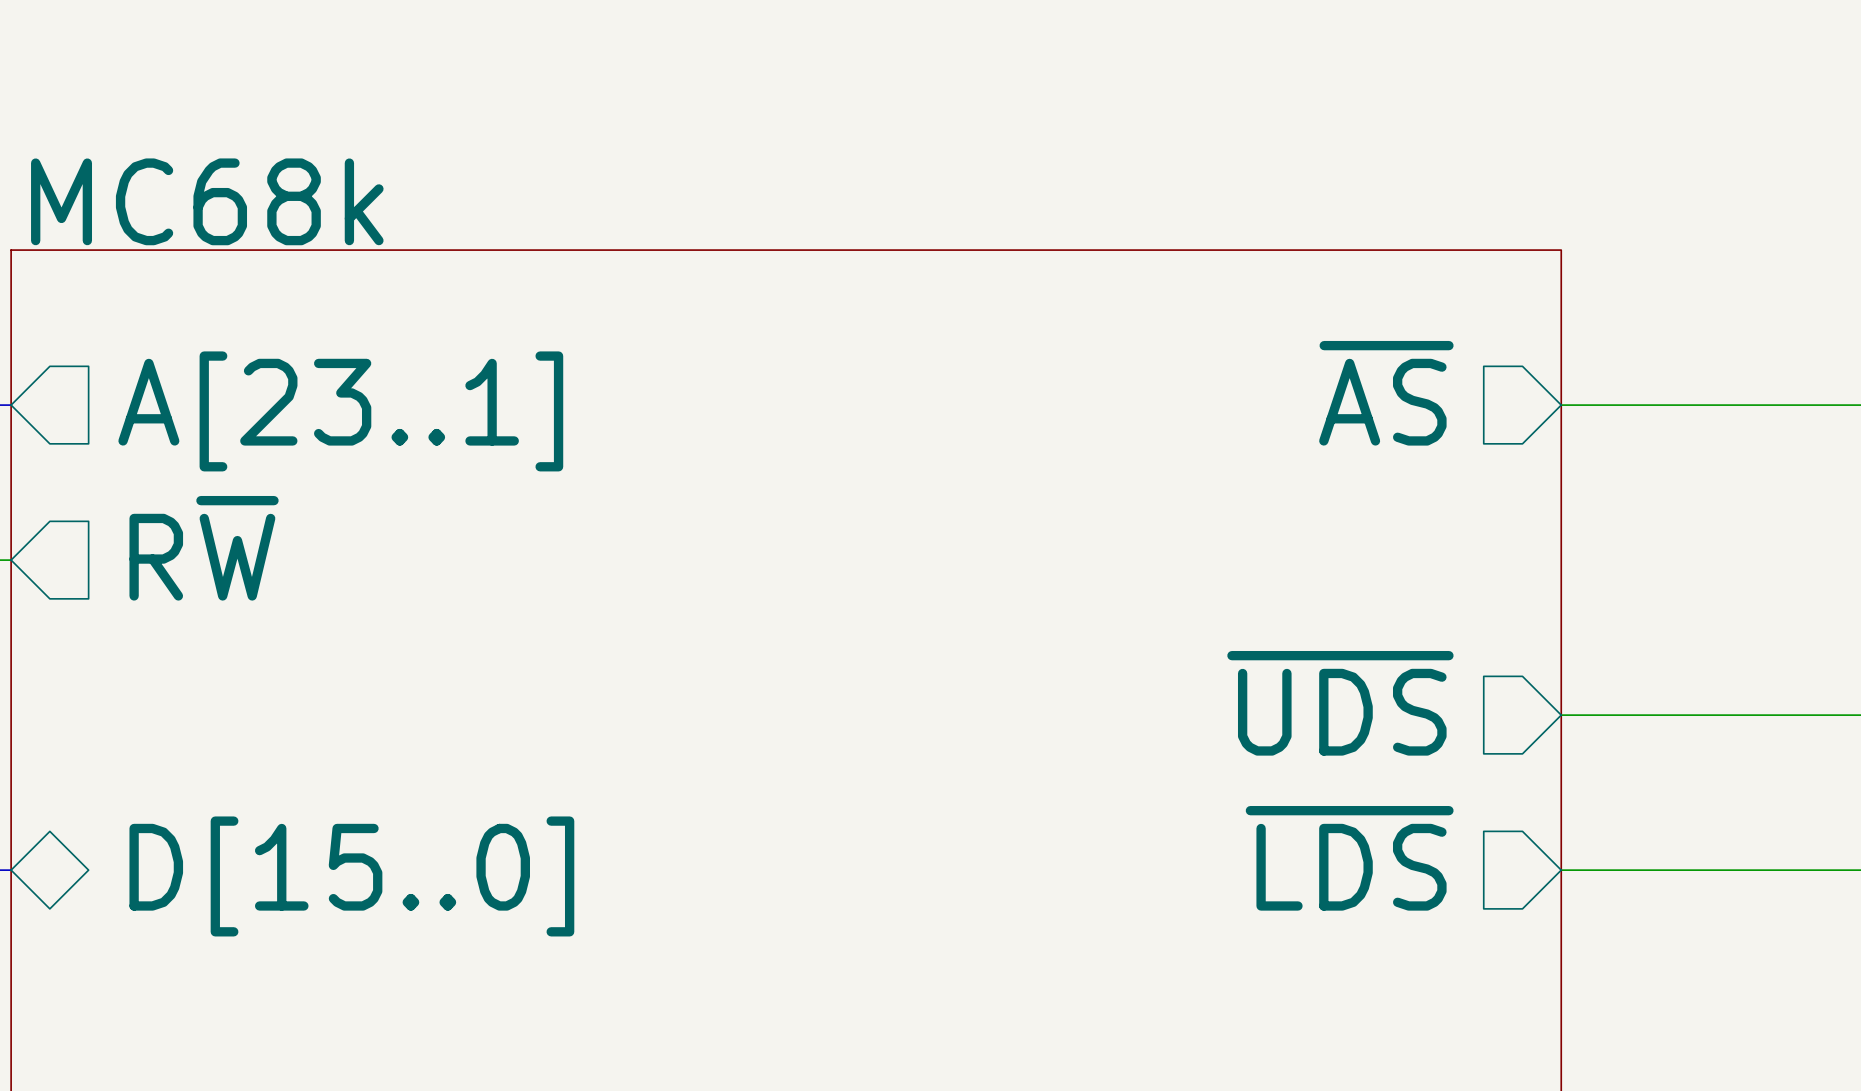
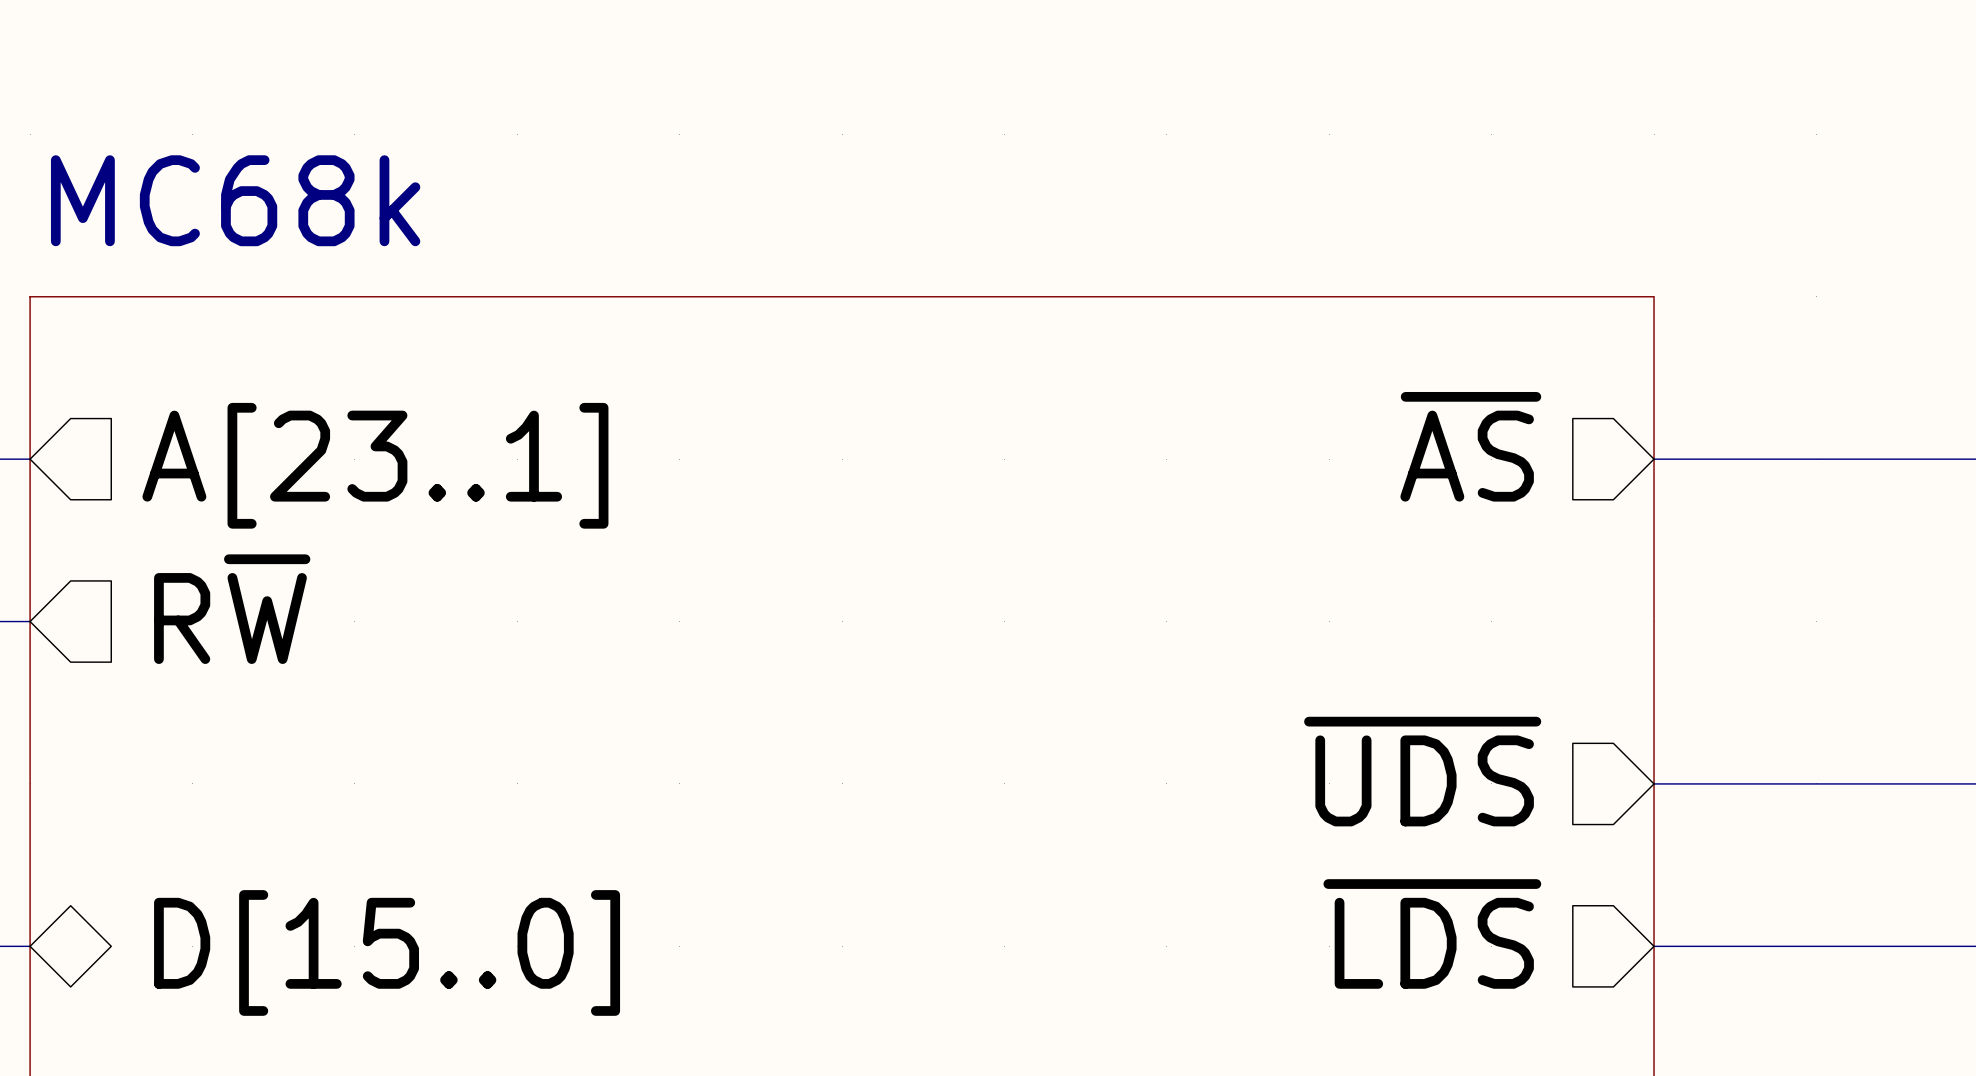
sheet MC68k name position: MC68k (207, 201) -> MC68k (235, 200)

